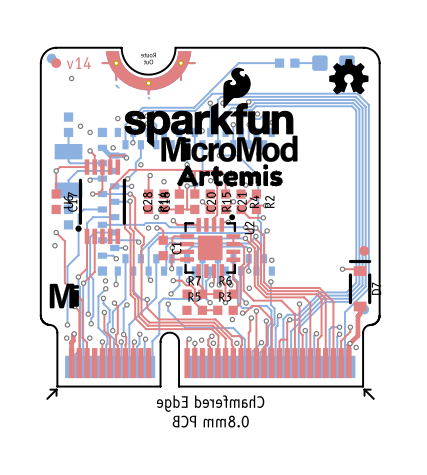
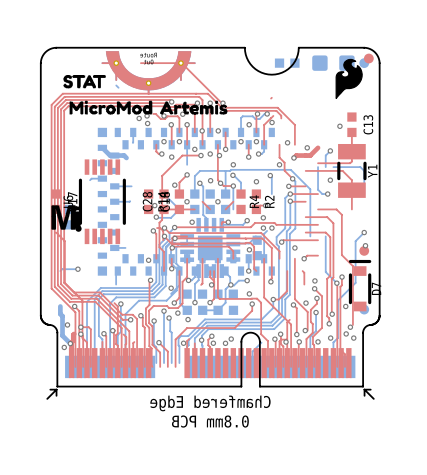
board edge: (121, 47) (123, 58) (129, 66) (138, 72) (148, 74) (158, 72) (167, 66) (173, 58) (175, 47) -> (121, 47) (175, 47)
board edge: (244, 47) (298, 47) -> (244, 47) (246, 58) (252, 66) (261, 72) (271, 74) (282, 72) (290, 66) (296, 58) (298, 47)
part side: bottom (51, 58) -> top (368, 58)
drawing shape: [329, 59, 369, 95] -> [335, 58, 363, 100]
part side: top (56, 63) -> bottom (364, 63)
text: v14 (78, 63) -> none
top track: none -> (140, 63) (181, 63) (226, 107) (277, 107) (294, 124) (294, 144)
bottom track: (279, 63) (238, 63) (194, 107) (142, 107) (125, 124) (125, 144) -> none
bottom track: (294, 63) (319, 63) -> none
drawing shape: [124, 67, 294, 148] -> [160, 100, 228, 115]
drawing: none -> [63, 74, 153, 115]
via: (71, 78) -> none
top track: none -> (196, 93) (62, 93) (51, 104) (51, 288) (75, 312) (75, 366)
top track: none -> (196, 93) (207, 93) (225, 110) (276, 110) (281, 118)
bottom track: (224, 93) (357, 93) (368, 104) (368, 288) (344, 312) (344, 366) -> none
bottom track: (224, 93) (212, 93) (195, 110) (143, 110) (139, 118) -> none
bottom track: (148, 97) (149, 98) -> none
top track: none -> (271, 97) (271, 98)
top track: none -> (171, 101) (169, 100) (65, 100) (57, 108) (57, 285) (71, 298) (96, 298) (129, 331) (129, 366)
via: none -> (171, 101)
bottom track: (248, 101) (250, 100) (354, 100) (362, 108) (362, 285) (349, 298) (323, 298) (291, 331) (291, 366) -> none
via: (248, 101) -> none
top track: none -> (197, 103) (169, 106) (165, 103) (67, 103) (61, 109) (61, 284) (72, 295) (98, 295) (122, 319) (130, 319)
via: none -> (197, 103)
top track: none -> (210, 103) (210, 132)
bottom track: (210, 103) (210, 132) -> none
bottom track: (222, 103) (250, 106) (254, 103) (353, 103) (359, 109) (359, 284) (347, 295) (321, 295) (297, 319) (289, 319) -> none
top track: none -> (153, 113) (160, 119) (165, 119) (167, 116) (177, 116) (179, 118) (179, 132)
via: none -> (182, 114)
top track: none -> (256, 115) (256, 132)
top track: none -> (273, 115) (264, 125) (264, 144)
via: (117, 118) -> none
bottom track: (149, 118) (156, 125) (156, 144) -> none
C13 side: bottom (68, 124) -> top (351, 124)
top track: none -> (171, 124) (171, 144)
via: none -> (171, 124)
top track: none -> (187, 124) (187, 144)
via: none -> (187, 124)
bottom track: (233, 124) (233, 144) -> none
via: (233, 124) -> none
bottom track: (249, 124) (248, 144) -> none
via: (80, 126) -> none
via: none -> (339, 126)
via: none -> (218, 130)
bottom track: (68, 132) (68, 161) (70, 163) (102, 163) -> none
via: (90, 132) -> none
top track: none -> (194, 132) (194, 113) (188, 107) (168, 110) (164, 106) (68, 106) (64, 110) (64, 282) (73, 292) (100, 292) (122, 314) (132, 314) (137, 319) (137, 366)
bottom track: (194, 132) (194, 149) -> none
top track: none -> (225, 132) (225, 149)
bottom track: (225, 132) (225, 113) (231, 107) (252, 110) (255, 106) (351, 106) (356, 110) (356, 282) (346, 292) (320, 292) (298, 314) (287, 314) (283, 319) (283, 366) -> none
top track: none -> (351, 132) (351, 161) (350, 163) (318, 163)
drawing: [161, 135, 298, 187] -> none
via: none -> (164, 141)
via: none -> (241, 141)
via: (132, 142) -> none
via: none -> (287, 142)
bottom track: (140, 144) (140, 157) (135, 162) (135, 170) (127, 178) -> none
top track: none -> (156, 144) (156, 151) (161, 154)
top track: none -> (202, 144) (202, 100) (199, 96) (64, 96) (54, 106) (54, 286) (69, 301) (95, 301) (121, 328) (121, 366)
bottom track: (202, 144) (202, 180) (196, 186) (187, 186) -> none
top track: none -> (217, 144) (217, 180) (223, 186) (233, 186)
bottom track: (217, 144) (217, 100) (221, 96) (355, 96) (365, 106) (365, 286) (350, 301) (324, 301) (298, 328) (298, 366) -> none
top track: none -> (248, 144) (248, 157)
top track: none -> (279, 144) (279, 157) (284, 162) (284, 170) (292, 178)
via: (113, 147) -> none
via: none -> (307, 147)
top track: none -> (318, 147) (310, 155) (296, 155) (293, 157)
via: none -> (225, 149)
top track: (90, 150) (94, 155) (94, 167) -> none
via: (90, 150) -> none
bottom track: none -> (330, 150) (325, 155) (325, 167)
via: none -> (330, 150)
via: none -> (161, 154)
top track: none -> (200, 155) (182, 155) (162, 175) (162, 219) (159, 222) (159, 247) (164, 251) (164, 271)
via: none -> (200, 155)
bottom track: (219, 155) (237, 155) (258, 175) (258, 219) (260, 222) (260, 247) (256, 251) (256, 271) -> none
top track: (126, 157) (124, 155) (111, 155) (110, 167) -> none
via: (126, 157) -> none
via: none -> (248, 157)
via: none -> (293, 157)
via: (140, 164) -> none
via: (187, 164) -> none
via: none -> (233, 164)
via: none -> (279, 164)
top track: (87, 167) (60, 167) (56, 170) (56, 194) -> none
top track: (102, 167) (102, 189) (98, 194) (92, 194) -> none
bottom track: none -> (318, 167) (318, 189) (322, 194) (327, 194)
bottom track: none -> (333, 167) (360, 167) (364, 170) (364, 194)
via: (56, 170) -> none
Y1 side: bottom (68, 170) -> top (351, 170)
bottom track: (114, 170) (77, 170) (68, 180) (68, 209) -> none
top track: (194, 170) (194, 194) -> none
bottom track: none -> (225, 170) (225, 194)
top track: none -> (305, 170) (342, 170) (351, 180) (351, 209)
bottom track: none -> (233, 174) (241, 182) (241, 194)
top track: (150, 175) (148, 194) -> none
via: (150, 175) -> none
bottom track: none -> (270, 175) (271, 194)
via: none -> (270, 175)
top track: (127, 178) (125, 181) (125, 228) (130, 233) (130, 294) (135, 299) (135, 318) (142, 325) -> (140, 315) (142, 317) (142, 325)
via: (127, 178) -> none
via: none -> (292, 178)
via: (90, 180) -> none
via: none -> (330, 180)
via: (164, 181) -> none
via: none -> (256, 181)
bottom track: none -> (199, 183) (203, 186) (203, 215) (206, 218) (206, 224)
via: none -> (199, 183)
top track: (220, 183) (217, 186) (217, 215) (214, 218) (214, 224) -> none
via: none -> (174, 185)
via: (245, 185) -> none
via: (131, 186) -> none
top track: (187, 186) (187, 209) -> none
via: (187, 186) -> none
bottom track: none -> (233, 186) (233, 209)
via: none -> (233, 186)
top track: none -> (288, 186) (305, 186)
via: none -> (288, 186)
via: (92, 194) -> none
bottom track: (102, 194) (130, 194) -> none
top track: (130, 194) (135, 198) (135, 228) (143, 236) (143, 244) (141, 246) (141, 314) (149, 322) (214, 322) (231, 340) (233, 363) -> none
via: (130, 194) -> none
bottom track: none -> (164, 194) (179, 209) (171, 217) (157, 217)
bottom track: none -> (194, 194) (194, 176) (200, 170) (290, 169) (310, 189) (310, 236)
top track: (225, 194) (225, 176) (220, 170) (129, 169) (110, 189) (110, 236) -> none
top track: (256, 194) (241, 209) (249, 217) (263, 217) -> none
top track: none -> (290, 194) (318, 194)
bottom track: none -> (290, 194) (285, 198) (285, 228) (276, 236) (276, 244) (278, 246) (278, 314) (271, 322) (206, 322) (188, 340) (187, 363)
via: none -> (290, 194)
via: none -> (327, 194)
top track: (130, 201) (130, 227) (133, 231) (133, 293) (138, 298) (138, 316) (147, 325) (212, 325) (225, 338) (225, 363) -> none
via: (130, 201) -> none
via: none -> (187, 201)
C20 side: top (194, 201) -> bottom (225, 201)
via: (202, 201) -> none
R15 side: top (210, 201) -> bottom (210, 201)
via: none -> (217, 201)
C21 side: top (225, 201) -> bottom (194, 201)
via: (233, 201) -> none
top track: none -> (290, 201) (305, 201)
bottom track: none -> (290, 201) (290, 227) (286, 231) (286, 293) (282, 298) (282, 316) (272, 325) (207, 325) (194, 338) (194, 363)
via: none -> (290, 201)
via: none -> (154, 205)
bottom track: (102, 209) (83, 209) (78, 214) (78, 255) (67, 266) (67, 324) -> none
top track: none -> (318, 209) (336, 209) (341, 214) (341, 255) (352, 266) (352, 324)
bottom track: (114, 217) (93, 217) (87, 223) (88, 314) -> none
top track: none -> (305, 217) (327, 217) (333, 223) (332, 314)
top track: (173, 220) (177, 224) (198, 224) -> none
via: (173, 220) -> none
bottom track: none -> (247, 220) (243, 224) (221, 224)
via: none -> (247, 220)
via: none -> (192, 222)
bottom track: (102, 224) (165, 222) (169, 227) (245, 227) -> none
top track: none -> (318, 224) (255, 222) (250, 227) (174, 227)
bottom track: none -> (174, 227) (169, 232) (169, 239) (162, 246) (162, 284) (153, 294) (103, 294) (98, 299) (98, 335) (102, 339) (102, 363)
via: none -> (174, 227)
top track: (245, 227) (250, 232) (250, 239) (257, 246) (257, 284) (267, 294) (316, 294) (321, 299) (321, 335) (318, 339) (318, 363) -> none
via: (245, 227) -> none
via: (148, 228) -> none
via: (157, 228) -> none
top track: none -> (164, 228) (169, 233) (261, 233) (279, 251) (279, 258)
via: none -> (164, 228)
top track: (255, 228) (264, 236) (264, 258) -> none
bottom track: (255, 228) (250, 233) (159, 233) (140, 251) (140, 258) -> none
via: (255, 228) -> none
via: none -> (263, 228)
via: none -> (271, 228)
top track: none -> (153, 230) (156, 233) (156, 258)
via: none -> (153, 230)
via: (267, 230) -> none
via: (56, 232) -> none
bottom track: (114, 232) (94, 232) (90, 237) (90, 275) (93, 278) (93, 316) (91, 323) -> none
top track: none -> (305, 232) (325, 232) (330, 237) (330, 275) (327, 278) (327, 316) (329, 323)
bottom track: none -> (364, 232) (355, 241) (355, 282) (338, 300) (338, 337) (333, 342) (333, 363)
via: none -> (364, 232)
top track: (87, 236) (87, 268) (78, 277) -> none
top track: (94, 236) (94, 272) (83, 283) -> none
top track: none -> (164, 236) (171, 243) (250, 242) (254, 246) (254, 268) (256, 271)
bottom track: none -> (164, 236) (164, 239) (159, 244) (159, 283) (151, 291) (102, 291) (94, 298) (94, 363)
via: none -> (164, 236)
bottom track: none -> (187, 236) (187, 244) (179, 244) (176, 247) (176, 263) (180, 267) (180, 303) (187, 310)
top track: (233, 236) (233, 244) (240, 244) (244, 247) (244, 263) (240, 267) (240, 303) (233, 310) -> none
top track: (255, 236) (255, 239) (260, 244) (260, 283) (268, 291) (318, 291) (325, 298) (325, 363) -> none
via: (255, 236) -> none
bottom track: none -> (325, 236) (325, 272) (336, 283)
top track: none -> (174, 238) (262, 238) (271, 248) (271, 278) (269, 280)
via: none -> (174, 238)
bottom track: (245, 238) (158, 238) (148, 248) (148, 278) (150, 280) -> none
via: (245, 238) -> none
bottom track: none -> (174, 239) (165, 247) (165, 286) (154, 297) (116, 297) (110, 303) (110, 363)
top track: (246, 239) (254, 247) (254, 286) (266, 297) (304, 297) (310, 303) (310, 363) -> none
bottom track: (102, 240) (136, 240) (138, 242) -> none
top track: none -> (318, 240) (283, 240) (281, 242)
via: (138, 242) -> none
via: none -> (281, 242)
via: (54, 245) -> none
via: none -> (365, 245)
U2 side: top (210, 246) -> bottom (210, 247)
via: (125, 247) -> none
C1 side: top (163, 247) -> bottom (257, 247)
via: none -> (294, 247)
top track: none -> (171, 249) (174, 246) (228, 246) (233, 251)
bottom track: none -> (171, 249) (171, 263) (176, 268) (176, 290) (166, 300) (139, 300) (125, 314) (125, 363)
top track: (249, 249) (249, 263) (243, 268) (243, 290) (253, 300) (281, 300) (294, 314) (294, 363) -> none
bottom track: (249, 249) (246, 246) (191, 246) (187, 251) -> none
top track: (187, 251) (175, 251) (171, 255) (171, 258) -> none
bottom track: (102, 255) (113, 255) (116, 258) -> none
top track: none -> (318, 255) (307, 255) (304, 258)
via: (116, 258) -> none
bottom track: (125, 258) (125, 299) (112, 312) (112, 330) -> none
top track: none -> (187, 258) (187, 277) (182, 281) (182, 303) (177, 308) (153, 306) (149, 310) (149, 323) (152, 326) (152, 344) (160, 352) (160, 366)
top track: none -> (202, 258) (201, 284)
bottom track: (202, 258) (202, 297) (200, 298) (163, 298) (159, 302) (159, 334) (152, 341) (152, 366) -> none
top track: none -> (217, 258) (217, 297) (219, 298) (257, 298) (261, 302) (261, 334) (267, 341) (267, 366)
bottom track: (217, 258) (219, 284) -> none
top track: (233, 258) (233, 279) (236, 282) (236, 290) (233, 294) -> none
bottom track: (233, 258) (233, 277) (237, 281) (237, 303) (242, 308) (266, 306) (271, 310) (271, 323) (267, 326) (267, 344) (260, 352) (260, 366) -> none
top track: none -> (294, 258) (294, 299) (307, 312) (307, 330)
via: none -> (304, 258)
top track: (171, 259) (187, 259) -> none
via: none -> (148, 260)
via: (271, 260) -> none
bottom track: none -> (77, 269) (62, 269) (60, 271)
via: none -> (77, 269)
top track: (342, 269) (358, 269) (360, 271) -> none
via: (342, 269) -> none
bottom track: (133, 271) (133, 291) (141, 299) (147, 299) -> none
top track: none -> (179, 271) (179, 297) (174, 303)
top track: (198, 271) (198, 284) (202, 288) (202, 294) (217, 294) -> none
bottom track: none -> (198, 271) (198, 280) (194, 283) (194, 302)
top track: none -> (210, 271) (210, 277) (214, 281) (214, 298) (210, 302)
bottom track: (210, 271) (210, 277) (206, 281) (206, 298) (210, 302) -> none
top track: (221, 271) (221, 280) (225, 283) (225, 302) -> none
bottom track: (241, 271) (241, 297) (246, 303) -> none
top track: none -> (287, 271) (287, 291) (278, 299) (273, 299)
top track: none -> (302, 271) (304, 284)
bottom track: (78, 277) (80, 349) (75, 354) (75, 366) -> none
via: (78, 277) -> none
top track: none -> (341, 277) (340, 349) (344, 354) (344, 366)
via: none -> (342, 277)
via: (105, 280) -> none
top track: (173, 280) (181, 280) (194, 289) (194, 302) (202, 310) (217, 310) -> none
via: (173, 280) -> none
bottom track: none -> (247, 280) (238, 280) (225, 289) (225, 302) (218, 310) (202, 310)
via: none -> (247, 280)
via: none -> (314, 280)
top track: none -> (149, 281) (149, 304) (145, 308) (145, 324) (149, 327) (152, 366)
bottom track: (270, 281) (270, 304) (274, 308) (274, 324) (271, 327) (267, 366) -> none
bottom track: (156, 282) (156, 297) (129, 324) (129, 366) -> (156, 282) (150, 288) (100, 288) (87, 301) (87, 363)
top track: (264, 282) (269, 288) (319, 288) (333, 301) (333, 363) -> (264, 282) (264, 297) (291, 324) (291, 366)
bottom track: (83, 283) (83, 366) -> none
via: (83, 283) -> none
top track: none -> (336, 283) (337, 366)
via: none -> (336, 283)
via: (116, 284) -> none
via: (219, 284) -> none
bottom track: (105, 288) (98, 296) (98, 327) (107, 336) (106, 366) -> none
via: (105, 288) -> none
via: none -> (171, 288)
via: (249, 288) -> none
top track: none -> (314, 288) (322, 296) (322, 327) (312, 336) (314, 366)
via: none -> (314, 288)
via: (171, 293) -> none
via: none -> (249, 293)
R7 side: top (194, 294) -> bottom (225, 294)
R6 side: top (225, 294) -> bottom (194, 294)
drawing position: (64, 296) -> (65, 217)
bottom track: (103, 298) (103, 303) (109, 309) (107, 332) (113, 339) (113, 366) -> none
via: (103, 298) -> none
top track: none -> (316, 298) (316, 303) (310, 309) (312, 332) (306, 339) (306, 366)
via: none -> (316, 298)
top track: (147, 299) (147, 307) (158, 319) (215, 319) (232, 336) (239, 336) (241, 338) (241, 363) -> none
via: (147, 299) -> none
bottom track: none -> (273, 299) (273, 307) (261, 319) (204, 319) (188, 336) (180, 336) (178, 338) (179, 363)
via: none -> (273, 299)
via: none -> (194, 302)
via: (225, 302) -> none
via: (114, 303) -> none
bottom track: none -> (120, 303) (117, 363)
via: none -> (120, 303)
via: none -> (174, 303)
via: (246, 303) -> none
top track: (299, 303) (302, 363) -> none
via: (299, 303) -> none
via: none -> (306, 303)
bottom track: (126, 304) (123, 308) (123, 334) -> none
via: (126, 304) -> none
bottom track: (168, 304) (168, 310) (185, 328) (233, 328) (244, 339) (244, 366) -> none
via: (168, 304) -> none
top track: none -> (252, 304) (252, 310) (234, 328) (187, 328) (175, 339) (175, 366)
via: none -> (252, 304)
top track: none -> (293, 304) (296, 308) (296, 334)
via: none -> (293, 304)
bottom track: none -> (60, 306) (62, 335) (71, 344) (71, 363)
via: none -> (345, 306)
top track: (360, 306) (357, 335) (348, 344) (348, 363) -> none
R5 side: top (194, 310) -> bottom (225, 310)
R3 side: top (225, 310) -> bottom (194, 310)
bottom track: none -> (164, 311) (164, 363)
via: none -> (164, 311)
top track: (256, 311) (256, 363) -> none
via: (256, 311) -> none
top track: (104, 312) (104, 331) (110, 336) (110, 363) -> none
via: (104, 312) -> none
bottom track: none -> (316, 312) (316, 331) (310, 336) (310, 363)
via: none -> (316, 312)
via: none -> (177, 313)
top track: (242, 313) (251, 306) (258, 306) (271, 319) (271, 363) -> none
via: (242, 313) -> none
via: (88, 314) -> none
via: none -> (332, 314)
via: none -> (140, 315)
bottom track: (279, 315) (277, 317) (277, 325) -> (292, 178) (295, 181) (295, 228) (289, 233) (289, 294) (285, 299) (285, 318) (277, 325)
via: (279, 315) -> none
bottom track: none -> (169, 318) (171, 332) (171, 363)
via: none -> (169, 318)
top track: (251, 318) (248, 332) (248, 363) -> none
via: (251, 318) -> none
via: none -> (130, 319)
via: none -> (188, 319)
via: (232, 319) -> none
via: (289, 319) -> none
bottom track: none -> (154, 320) (156, 363)
via: none -> (154, 320)
top track: (266, 320) (264, 363) -> none
via: (266, 320) -> none
via: (91, 323) -> none
via: none -> (329, 323)
top track: none -> (80, 327) (88, 327) (90, 329) (90, 366)
via: none -> (80, 327)
top track: (144, 327) (211, 329) (218, 335) (217, 363) -> (144, 327) (144, 366)
bottom track: (275, 327) (275, 366) -> (275, 327) (208, 329) (202, 335) (202, 363)
bottom track: (339, 327) (331, 327) (329, 329) (329, 366) -> none
via: (339, 327) -> none
top track: (350, 327) (350, 331) (341, 341) (341, 363) -> none
top track: none -> (115, 330) (113, 366)
bottom track: (305, 330) (306, 366) -> none
via: (74, 333) -> none
top track: none -> (103, 333) (106, 336) (106, 366)
via: none -> (103, 333)
bottom track: (316, 333) (314, 336) (314, 366) -> none
via: (316, 333) -> none
via: none -> (346, 333)
top track: none -> (80, 334) (83, 336) (83, 366)
via: none -> (80, 334)
via: (123, 334) -> none
bottom track: (139, 334) (139, 344) (137, 346) (137, 366) -> none
via: (139, 334) -> none
top track: none -> (280, 334) (280, 344) (283, 346) (283, 366)
via: none -> (280, 334)
via: none -> (296, 334)
bottom track: (339, 334) (337, 336) (337, 366) -> none
via: (339, 334) -> none
via: (66, 338) -> none
via: (89, 338) -> none
via: none -> (330, 338)
via: none -> (353, 338)
bottom track: (145, 339) (144, 366) -> none
via: (145, 339) -> none
via: (189, 339) -> none
via: none -> (231, 339)
top track: none -> (274, 339) (275, 366)
via: none -> (274, 339)
via: (102, 341) -> none
bottom track: (121, 341) (121, 366) -> none
via: (121, 341) -> none
top track: none -> (299, 341) (298, 366)
via: none -> (299, 341)
via: none -> (318, 341)
via: (134, 342) -> none
top track: none -> (158, 342) (167, 351) (167, 366)
via: none -> (158, 342)
via: (261, 342) -> none
via: none -> (286, 342)
via: none -> (70, 343)
via: none -> (183, 343)
via: (194, 343) -> none
via: none -> (225, 343)
via: (236, 343) -> none
via: (350, 343) -> none
via: none -> (64, 347)
via: (356, 347) -> none
board edge: (160, 386) (160, 340) (163, 335) (169, 332) (176, 335) (178, 340) (179, 386) -> (160, 386) (179, 386)
board edge: (241, 386) (259, 386) -> (241, 386) (241, 340) (244, 335) (250, 332) (257, 335) (259, 340) (259, 386)

